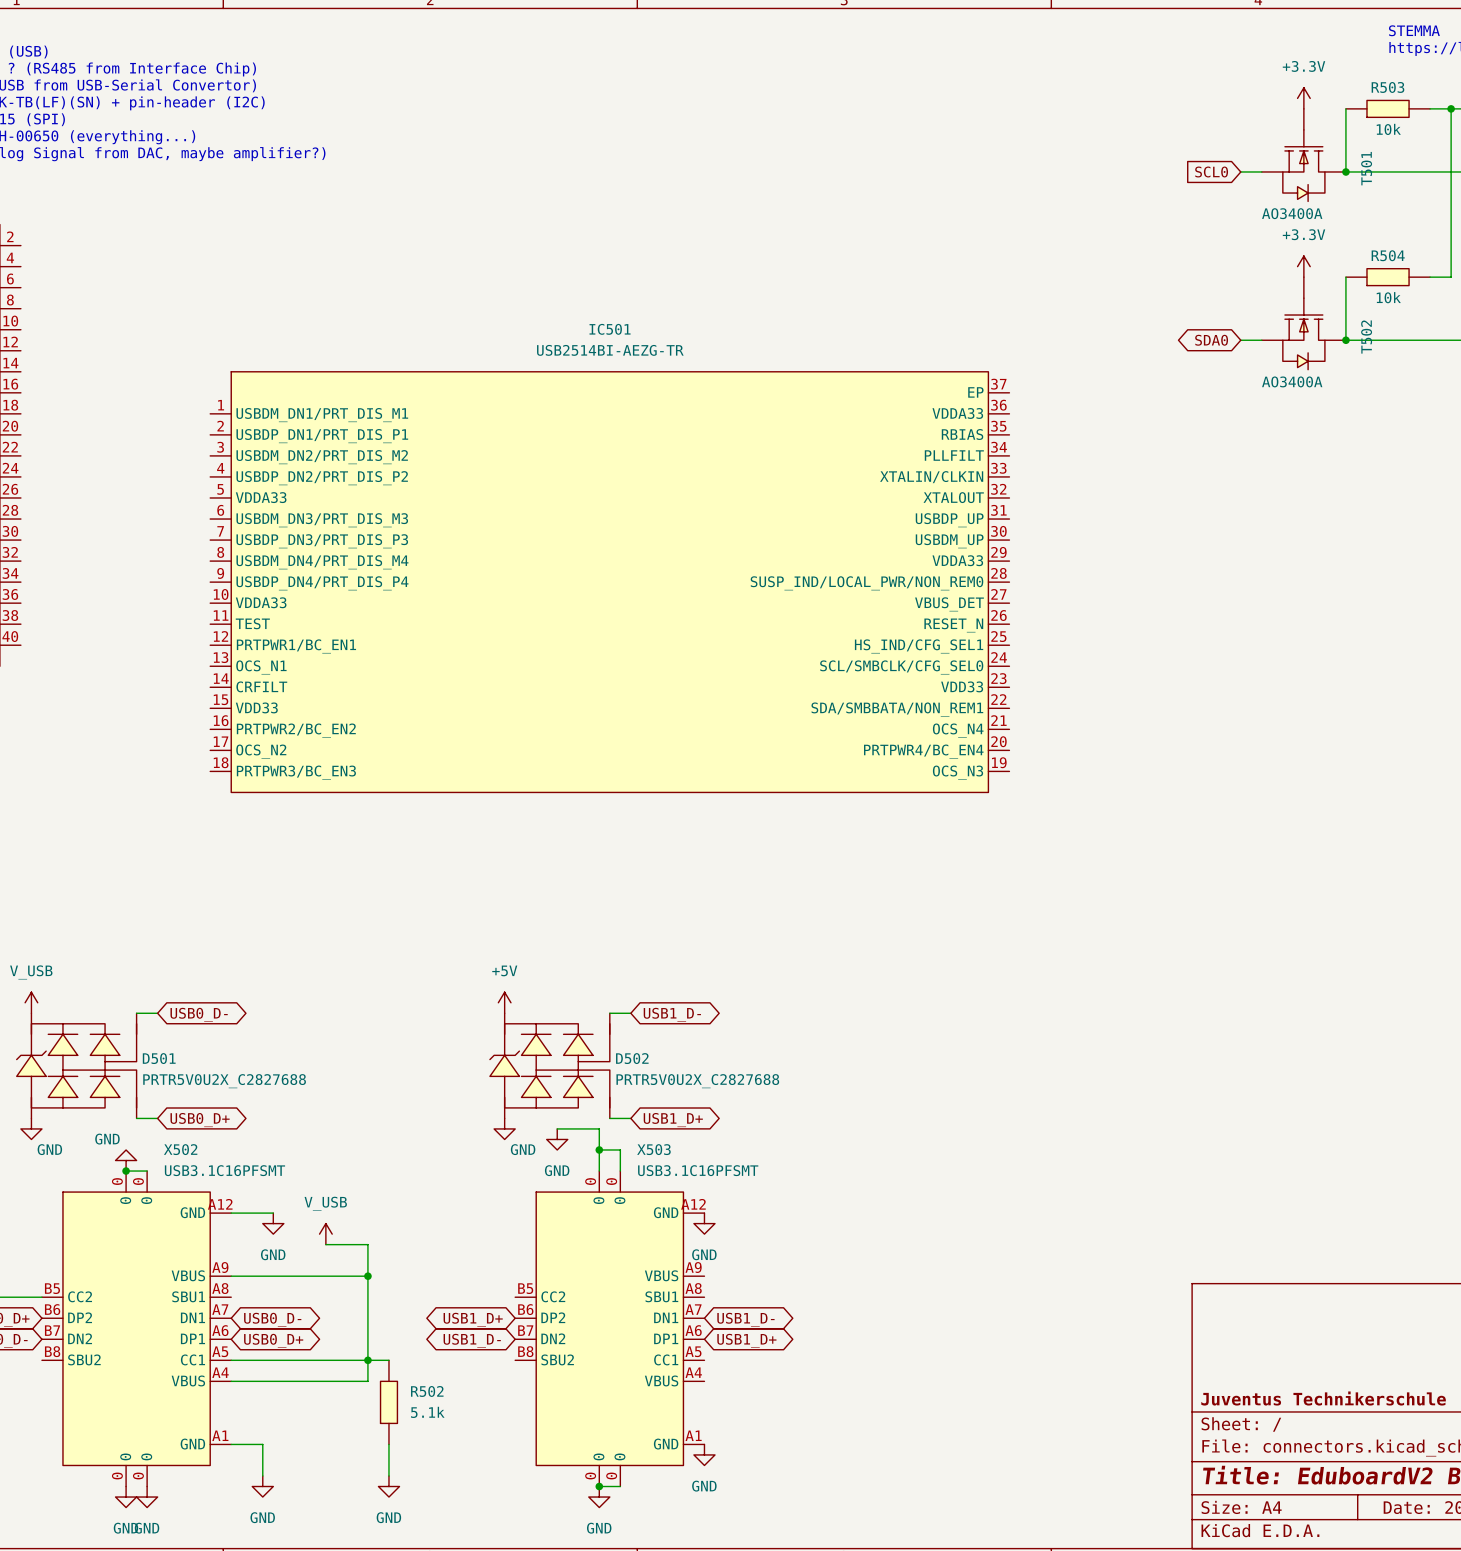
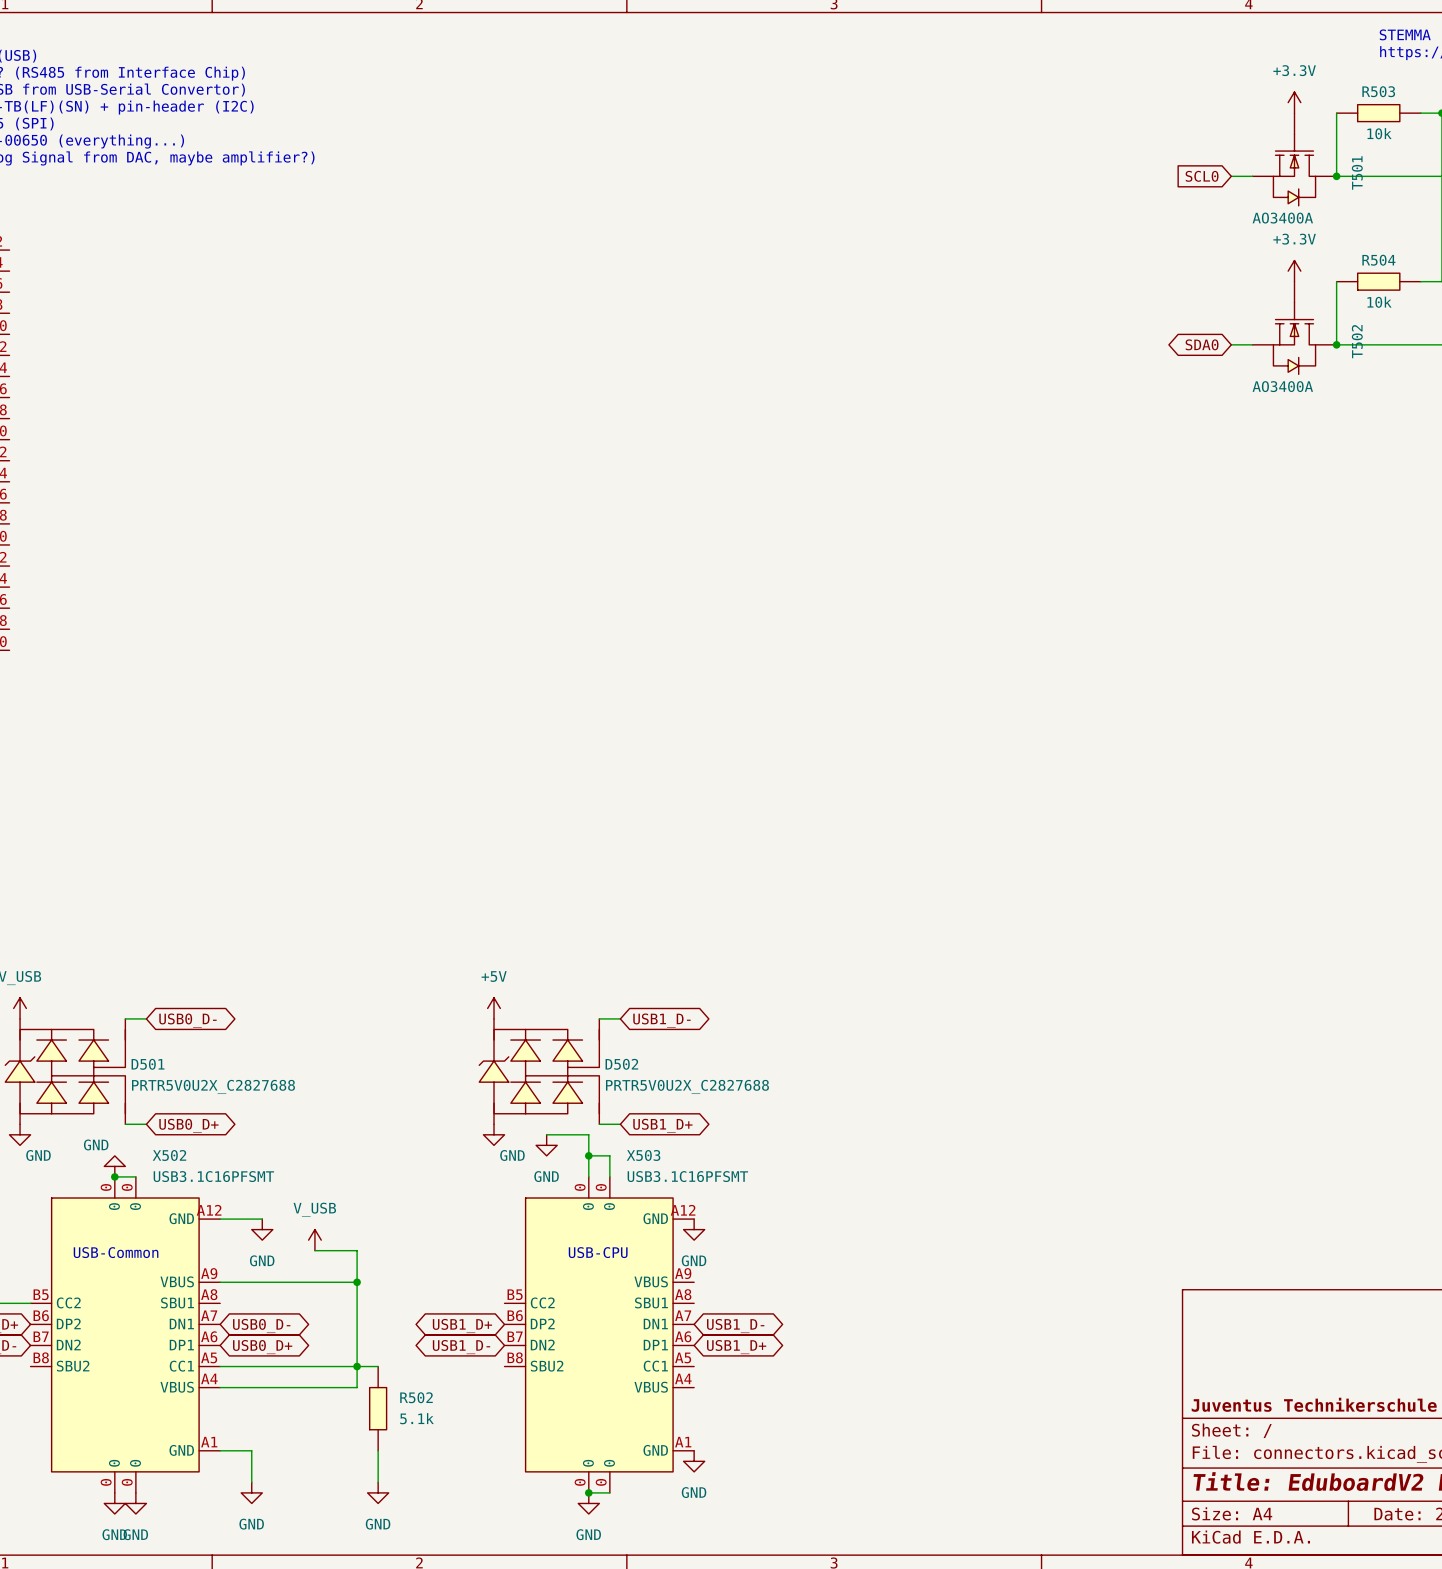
IC501: USB2514BI-AEZG-TR (609, 582) -> none
text: none -> USB-Common (116, 1252)
text: none -> USB-CPU (598, 1252)

